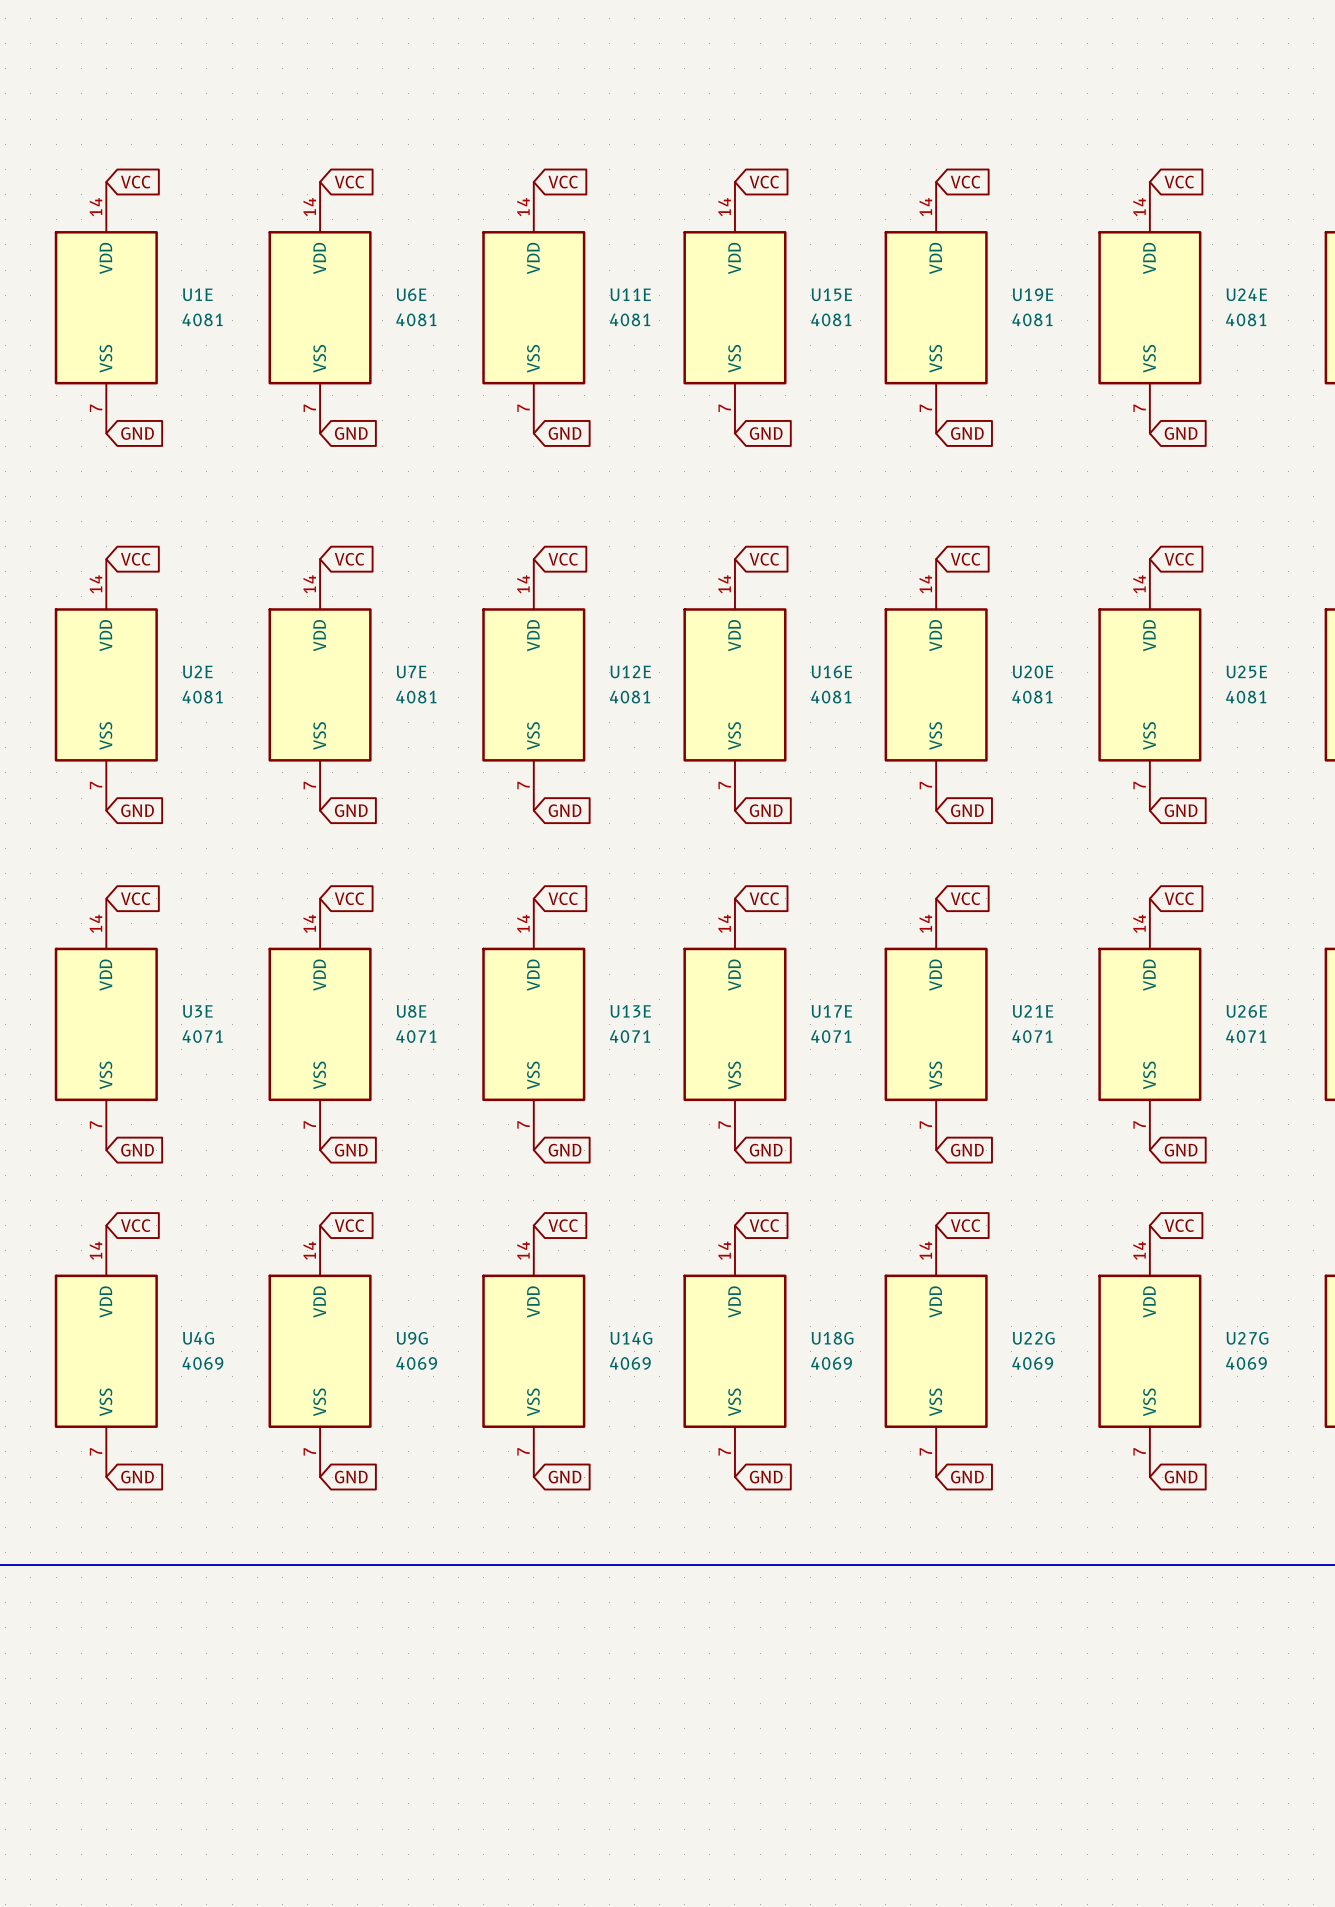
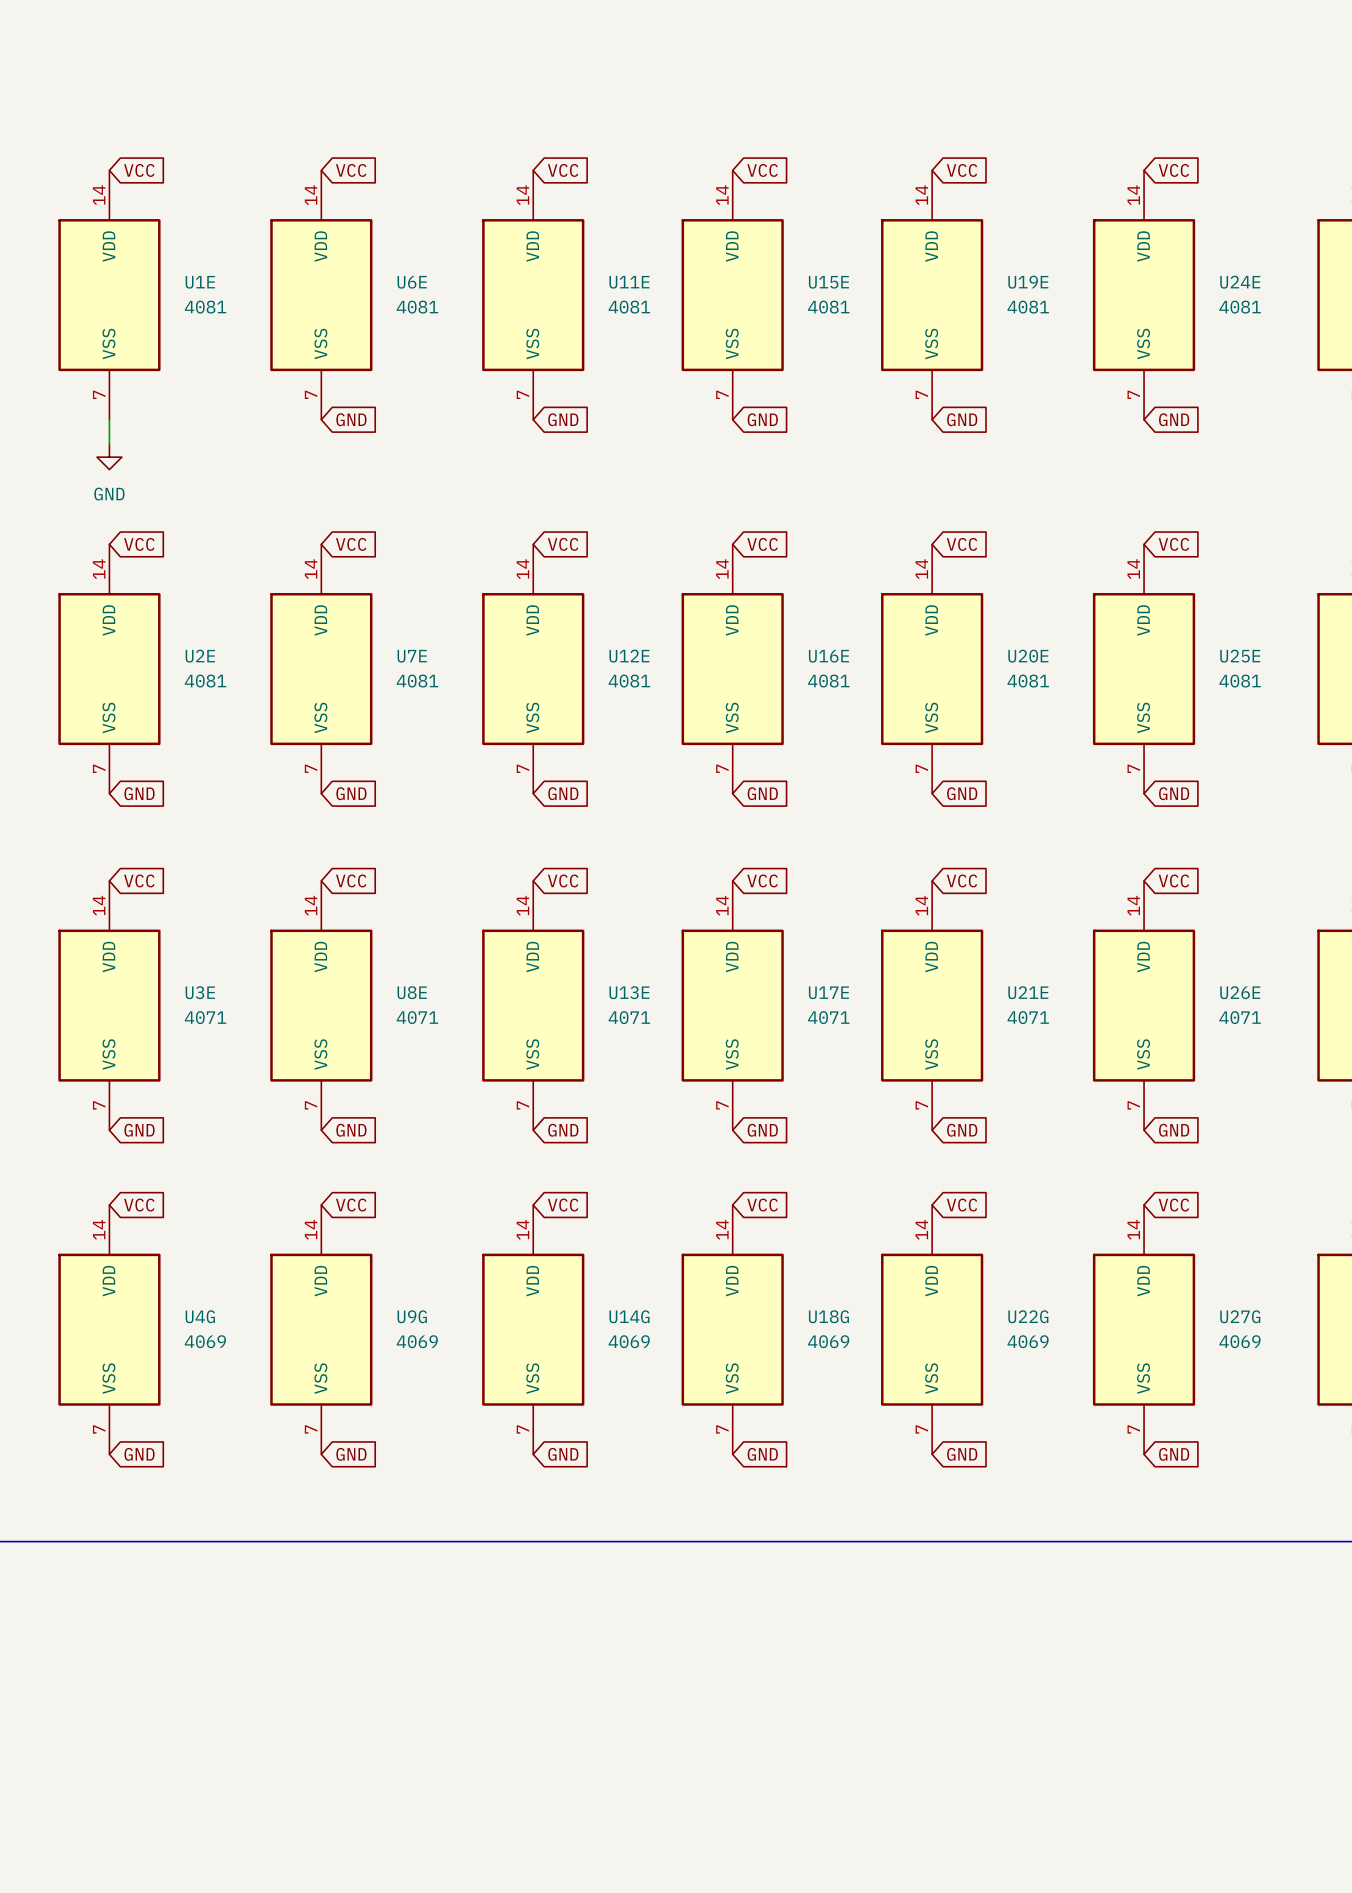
wire: none -> (109, 419) (109, 444)
global label: GND (137, 433) -> none
power symbol: none -> GND (109, 457)

